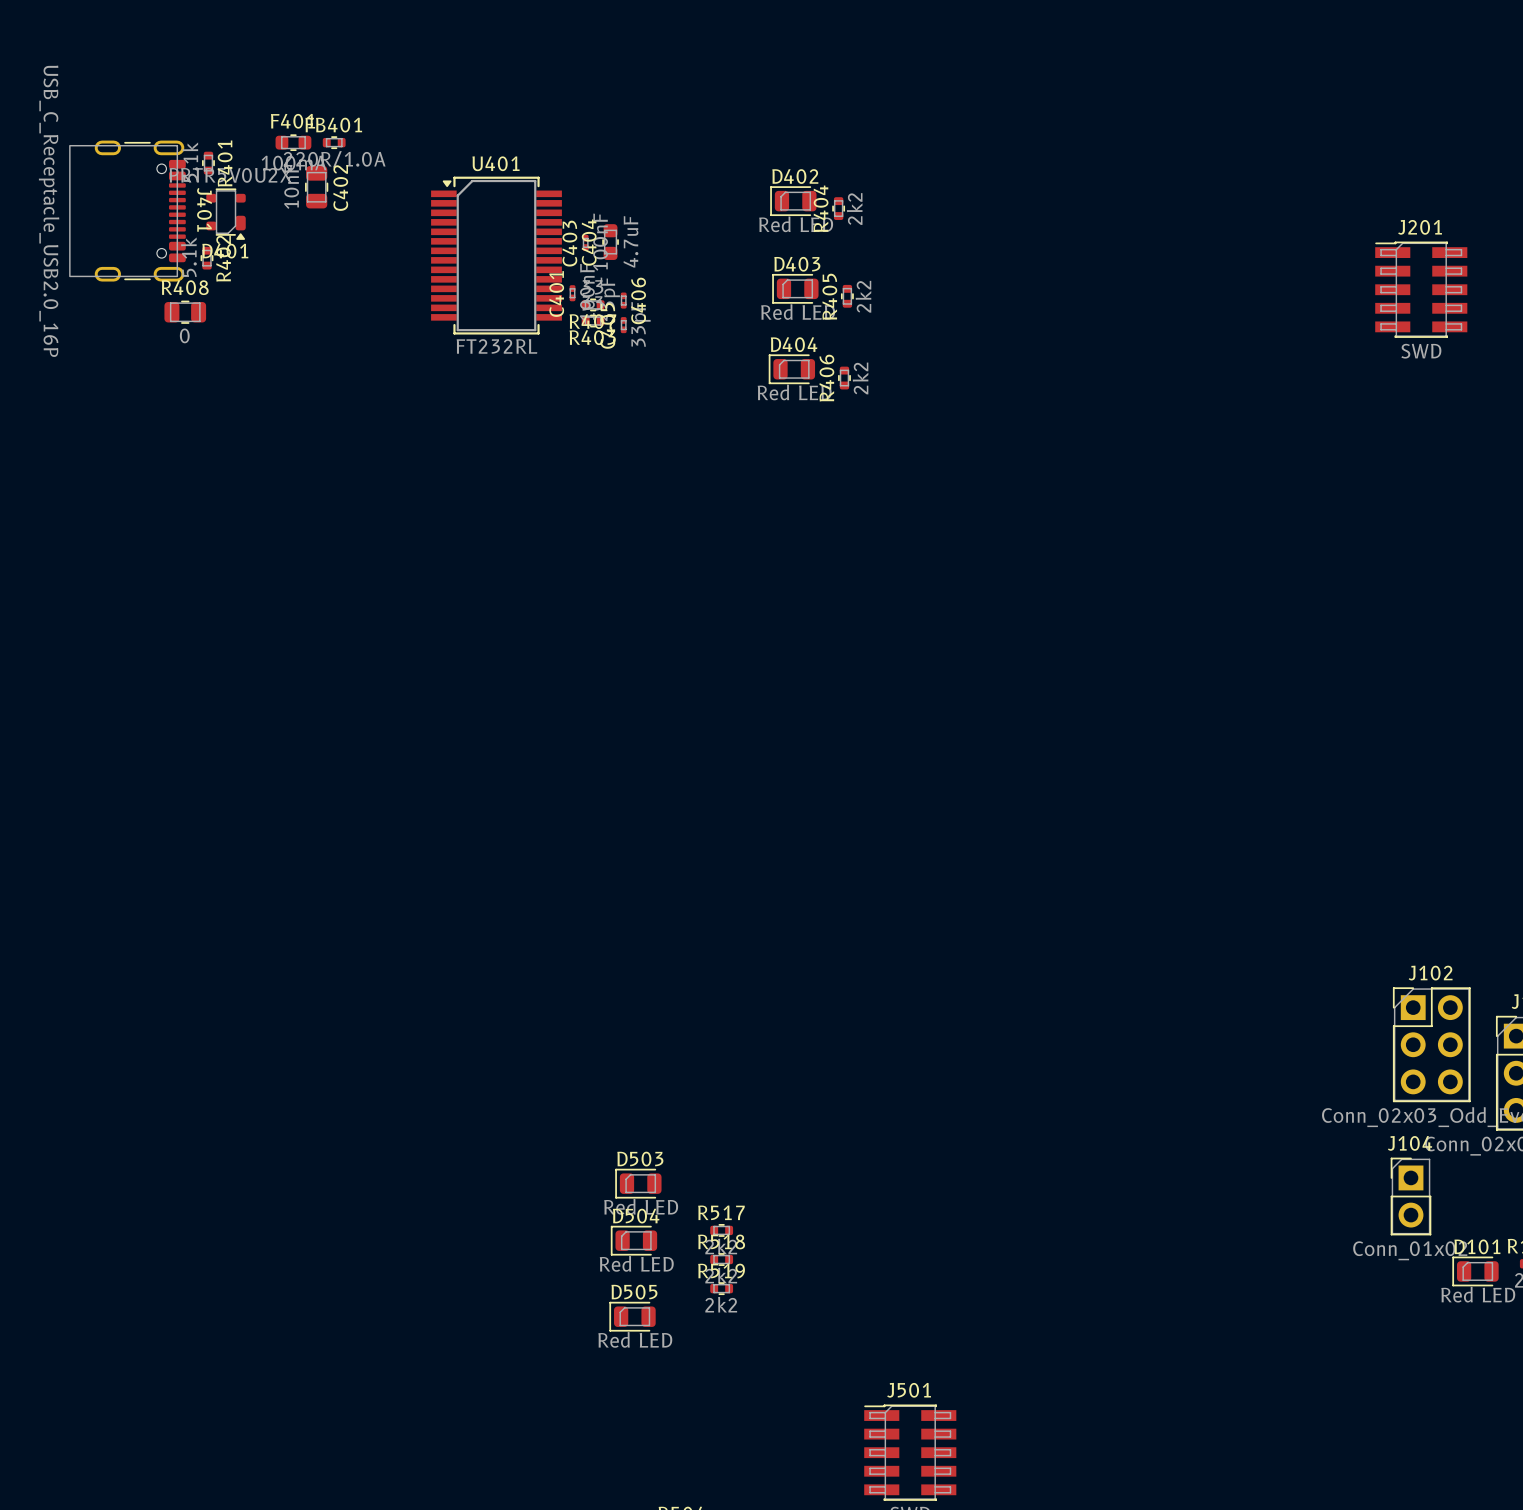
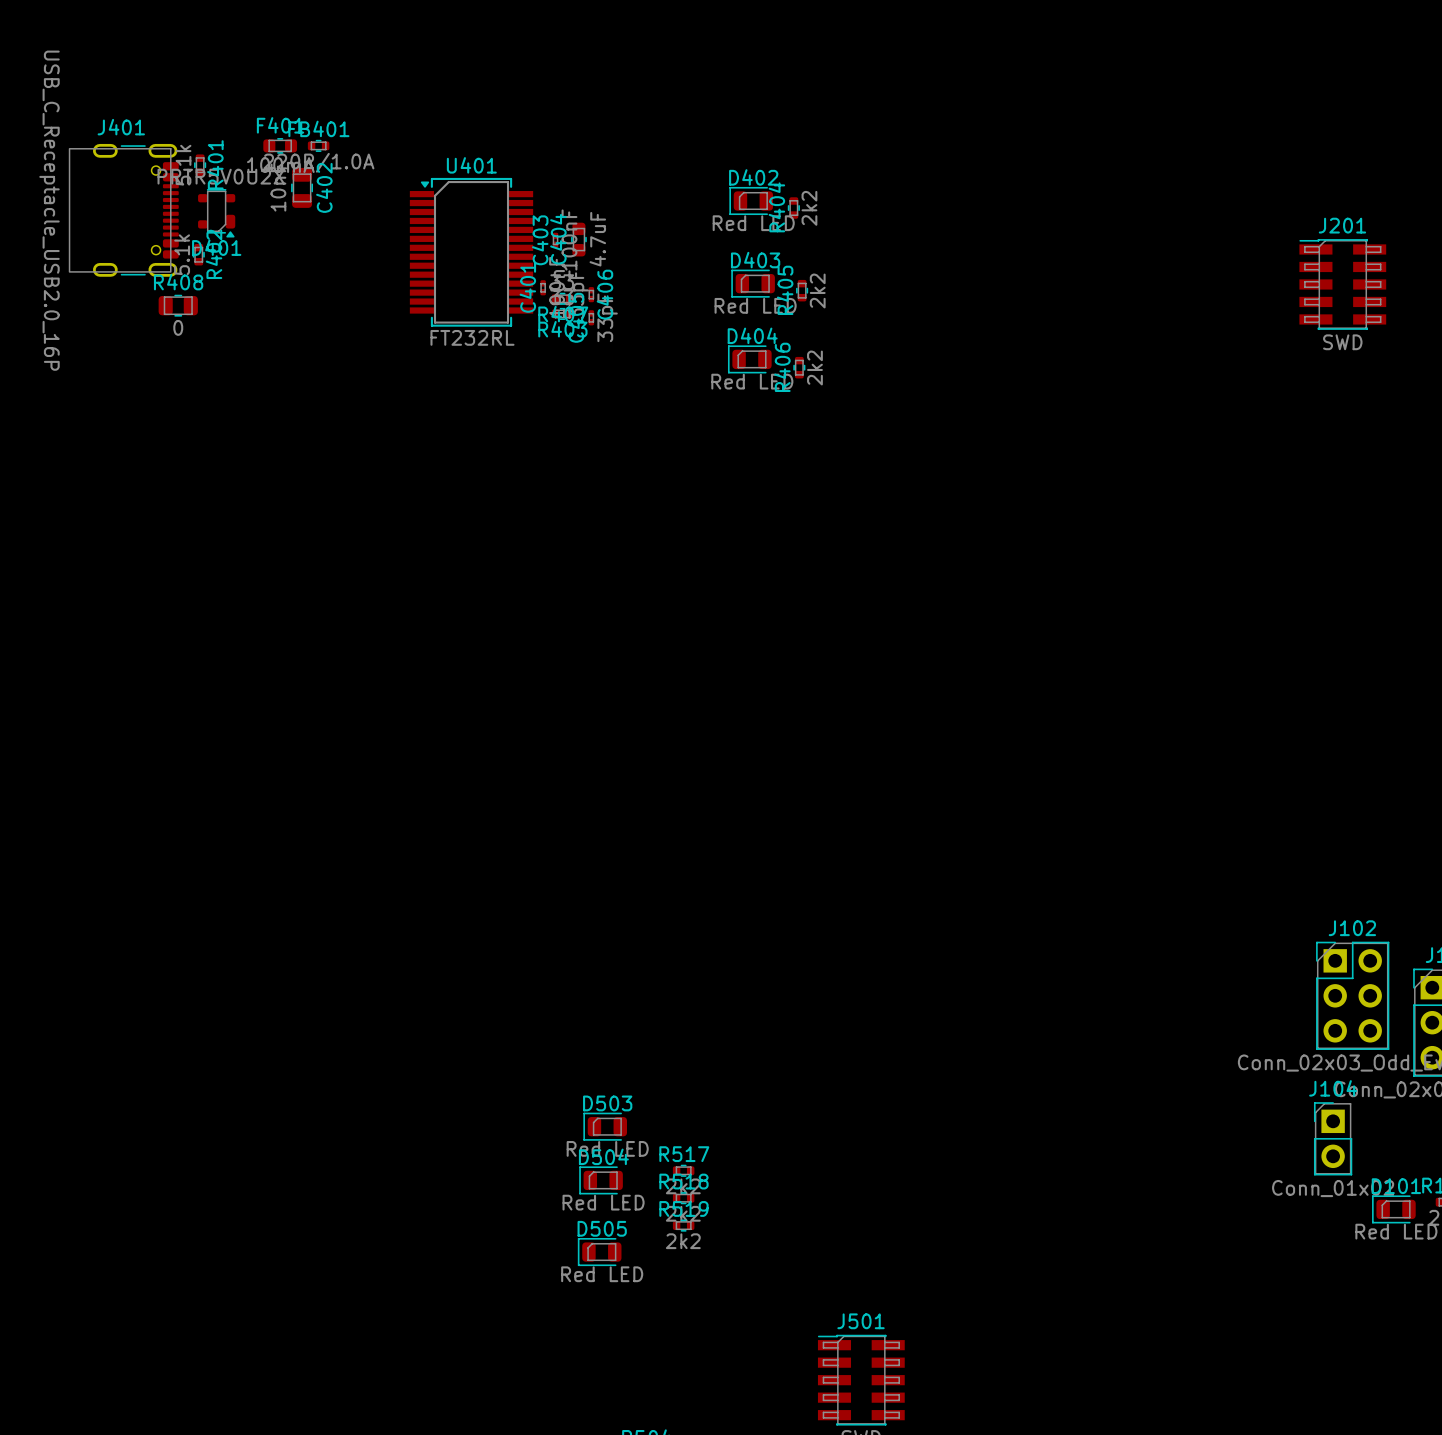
J401 name rotation: 0° (204, 209) -> 90° counterclockwise (121, 127)
J401 name position: J401 (204, 209) -> J401 (121, 127)

